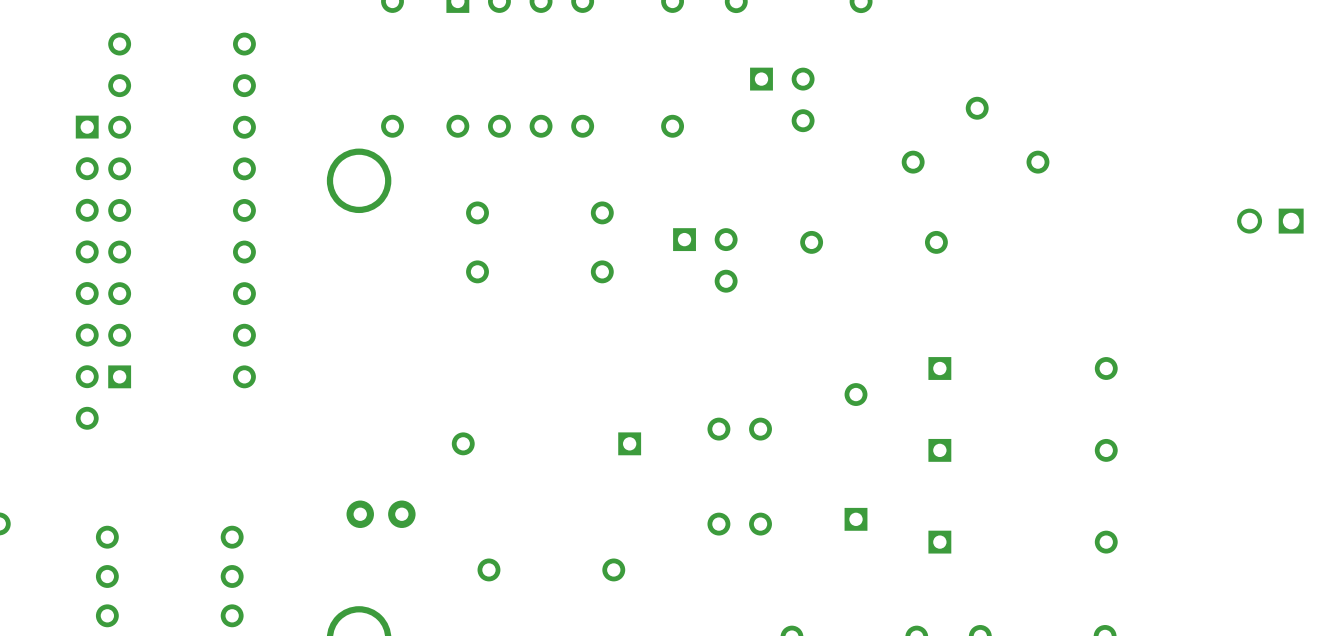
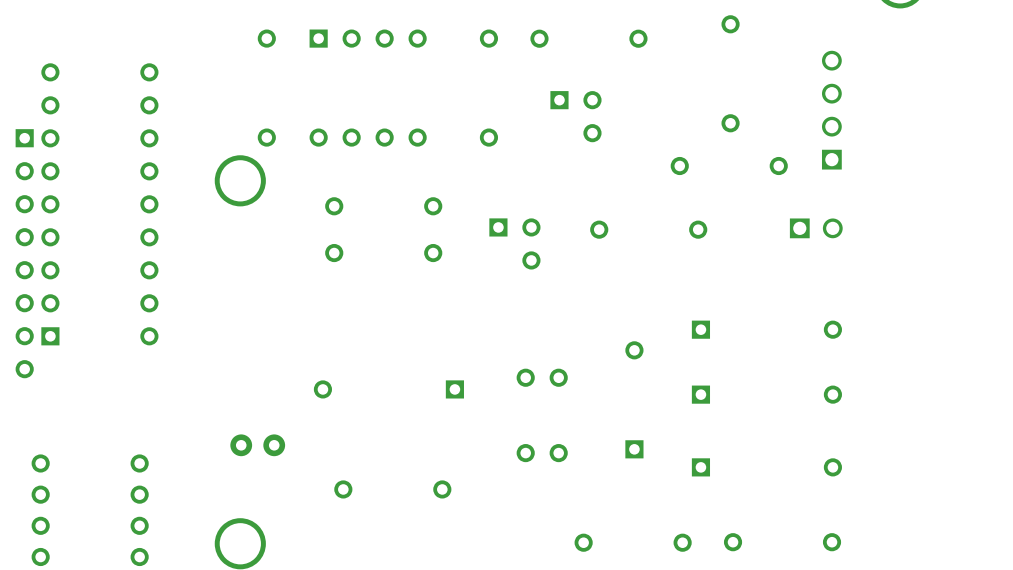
part: none -> (831, 110)
part rotation: 0° (1270, 221) -> 180° (816, 228)
part position: (1270, 221) -> (816, 228)

